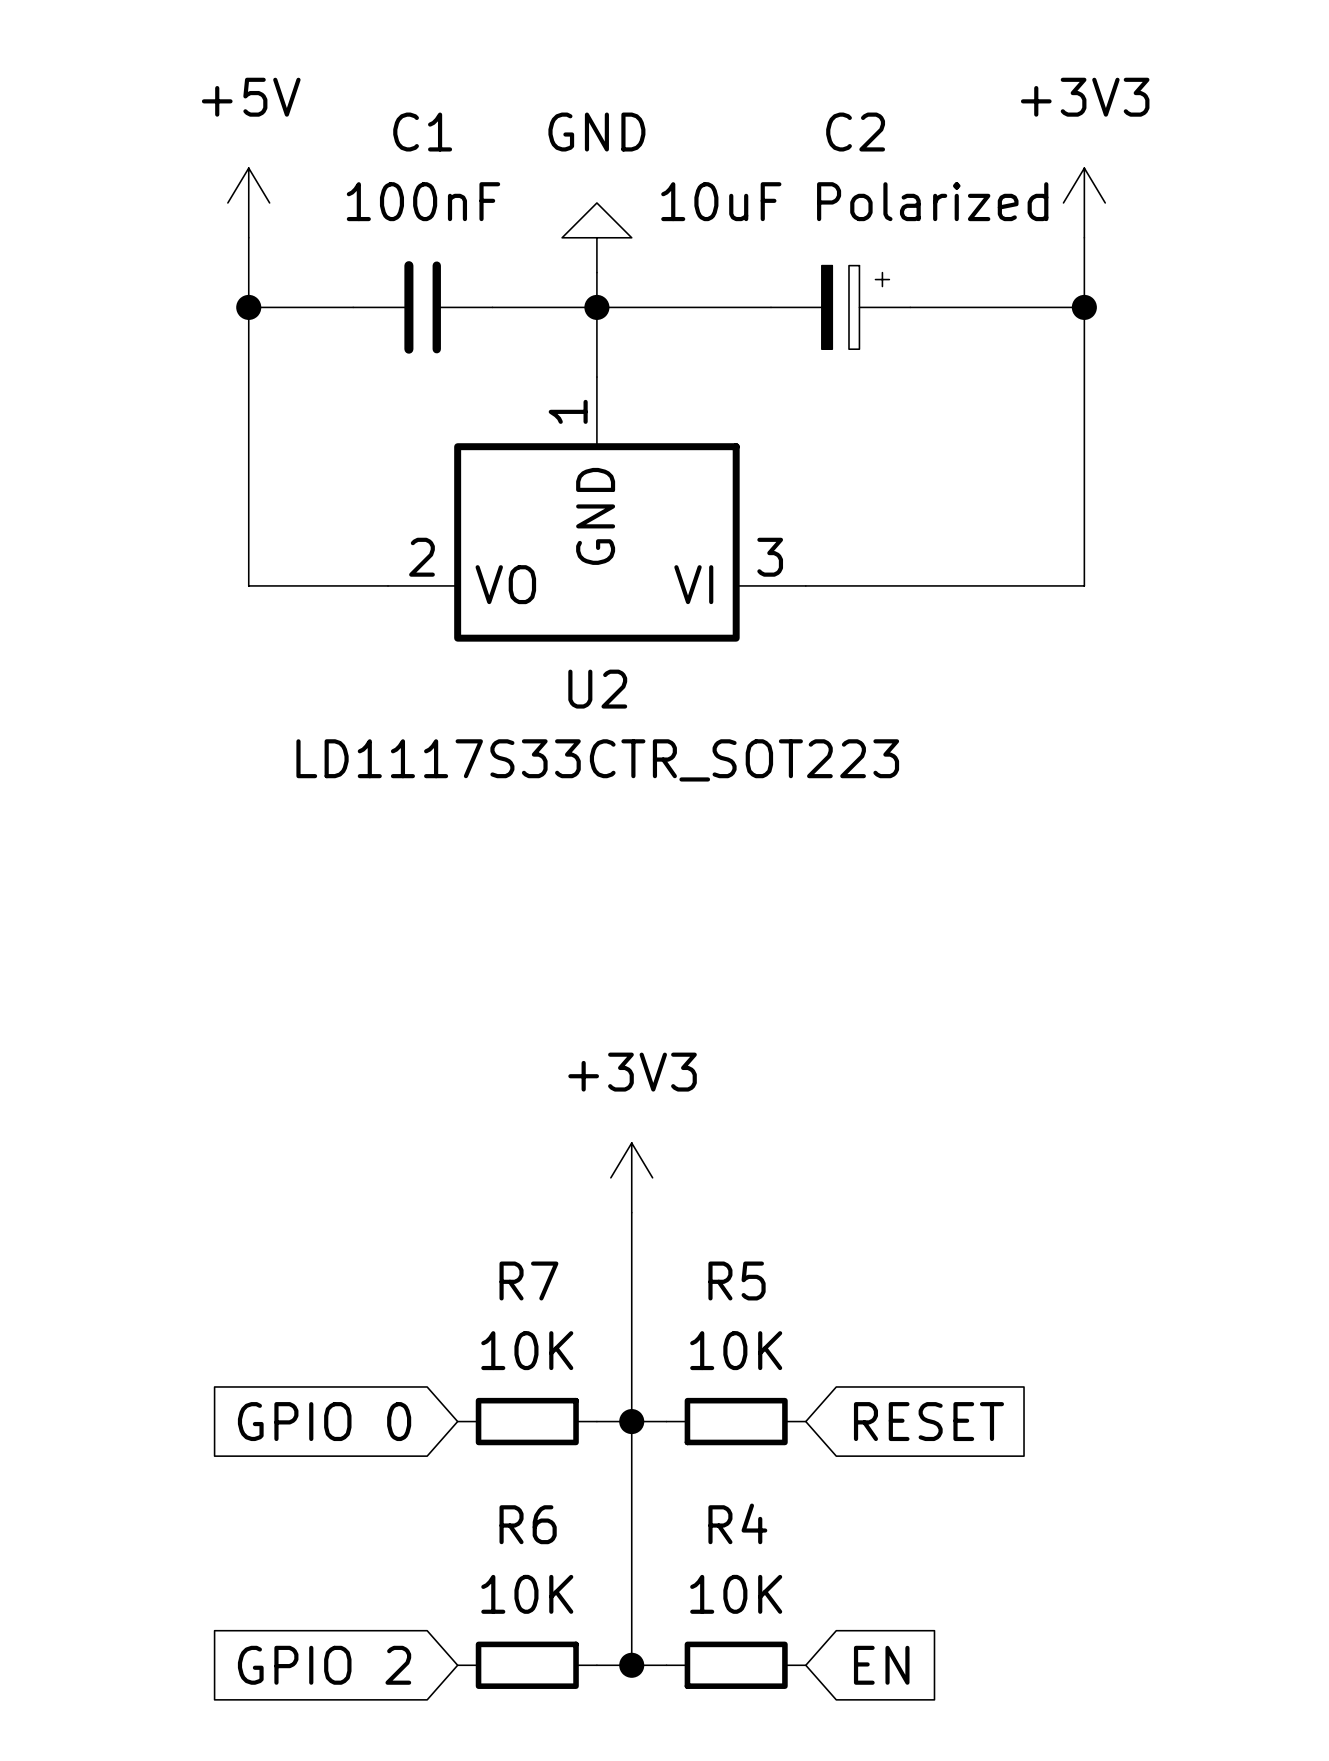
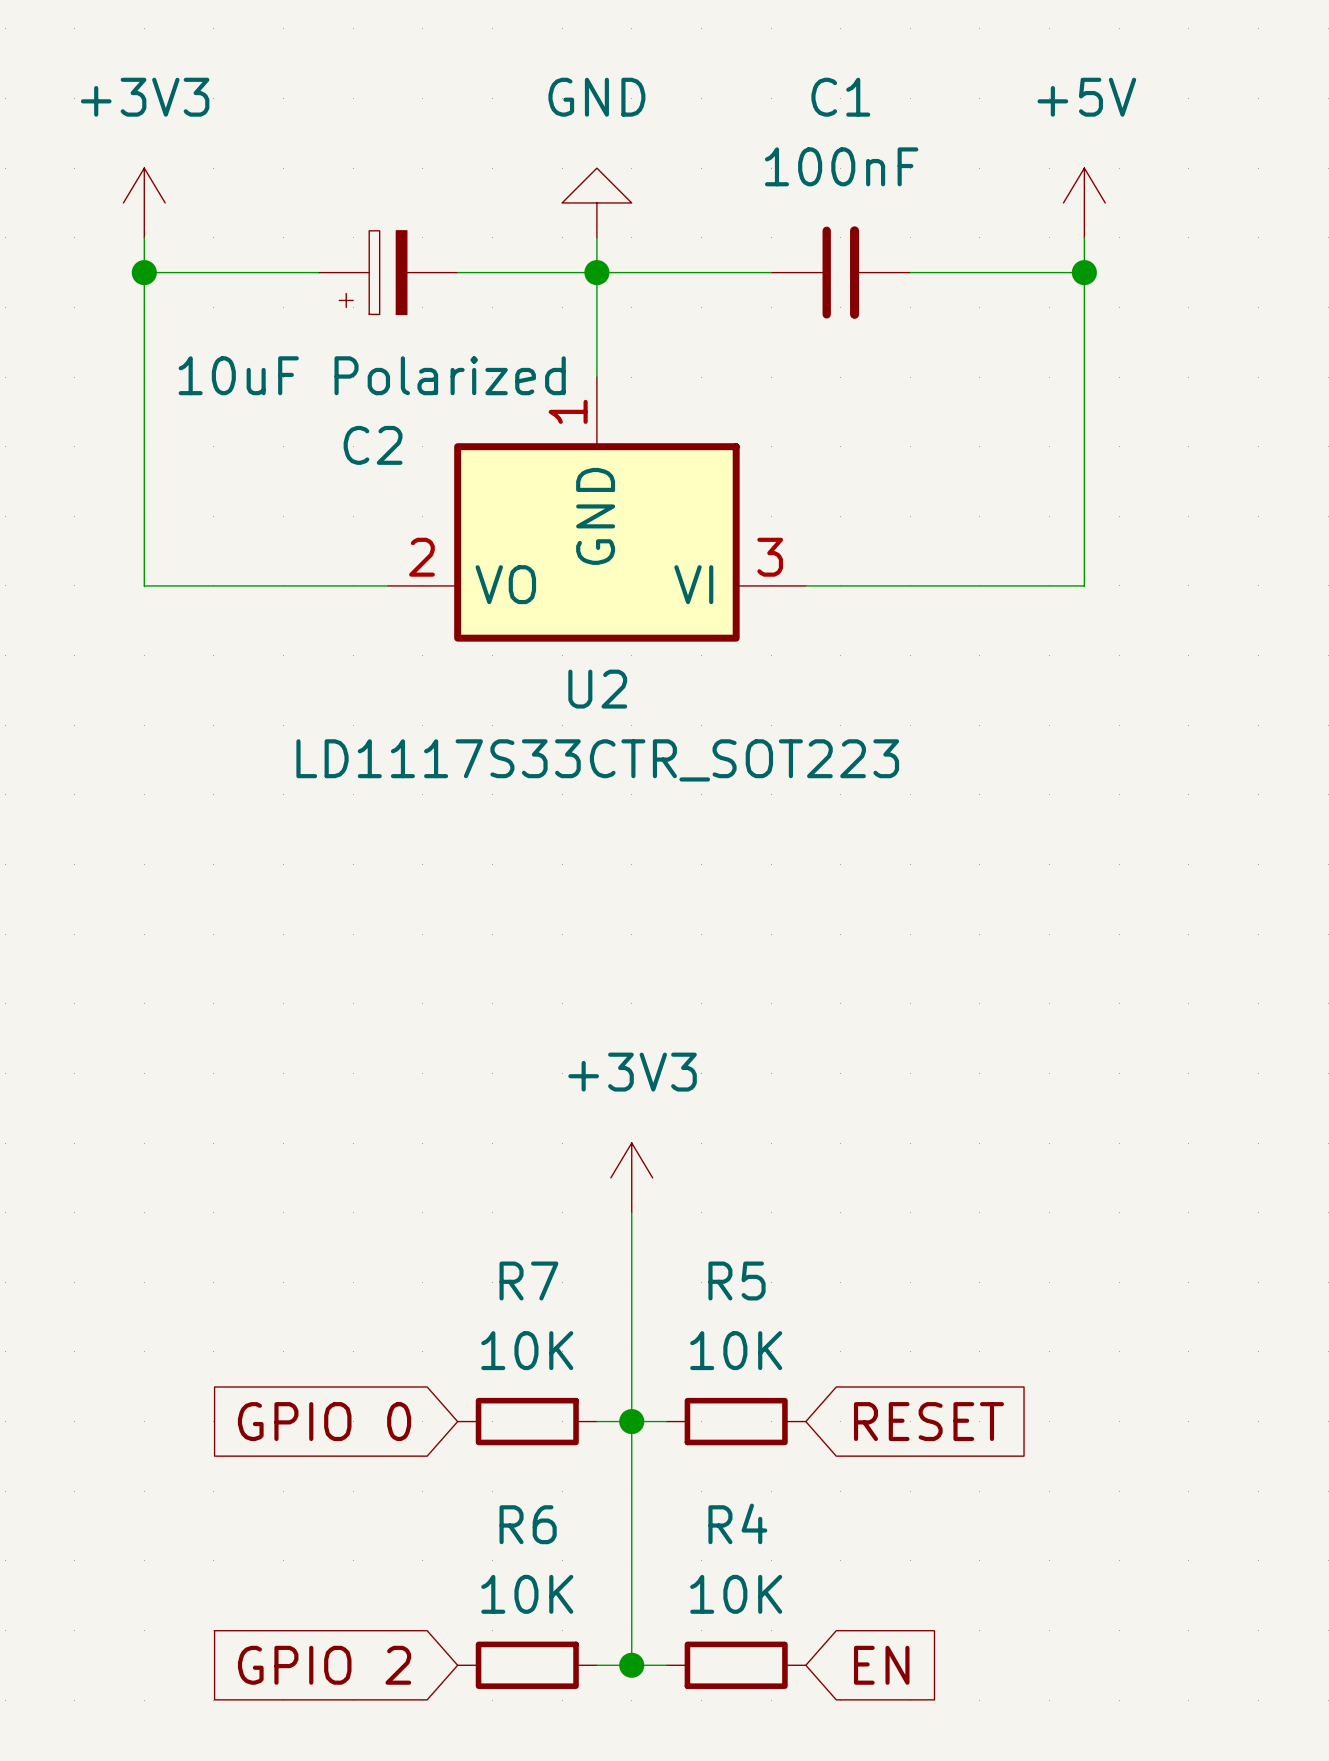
power symbol: none -> +3V3 (144, 202)
power symbol: +5V (248, 202) -> none
power symbol: +3V3 (1084, 202) -> +5V (1084, 202)
wire: (248, 237) (248, 585) -> (144, 237) (144, 585) (248, 585)
power symbol position: GND (596, 237) -> GND (596, 202)
wire: none -> (144, 272) (318, 272)
wire: none -> (457, 272) (771, 272)
wire: (248, 307) (353, 307) -> none
junction position: (248, 307) -> (144, 272)
C1 rotation: 0° (422, 307) -> 180° (840, 272)
C1 position: (422, 307) -> (840, 272)
wire: (492, 307) (771, 307) -> none
junction position: (596, 307) -> (596, 272)
C2 position: (840, 307) -> (388, 272)
C2 rotation: 0° (855, 307) -> 180° (373, 272)
wire: (910, 307) (1084, 307) -> (910, 272) (1084, 272)
junction position: (1084, 307) -> (1084, 272)

